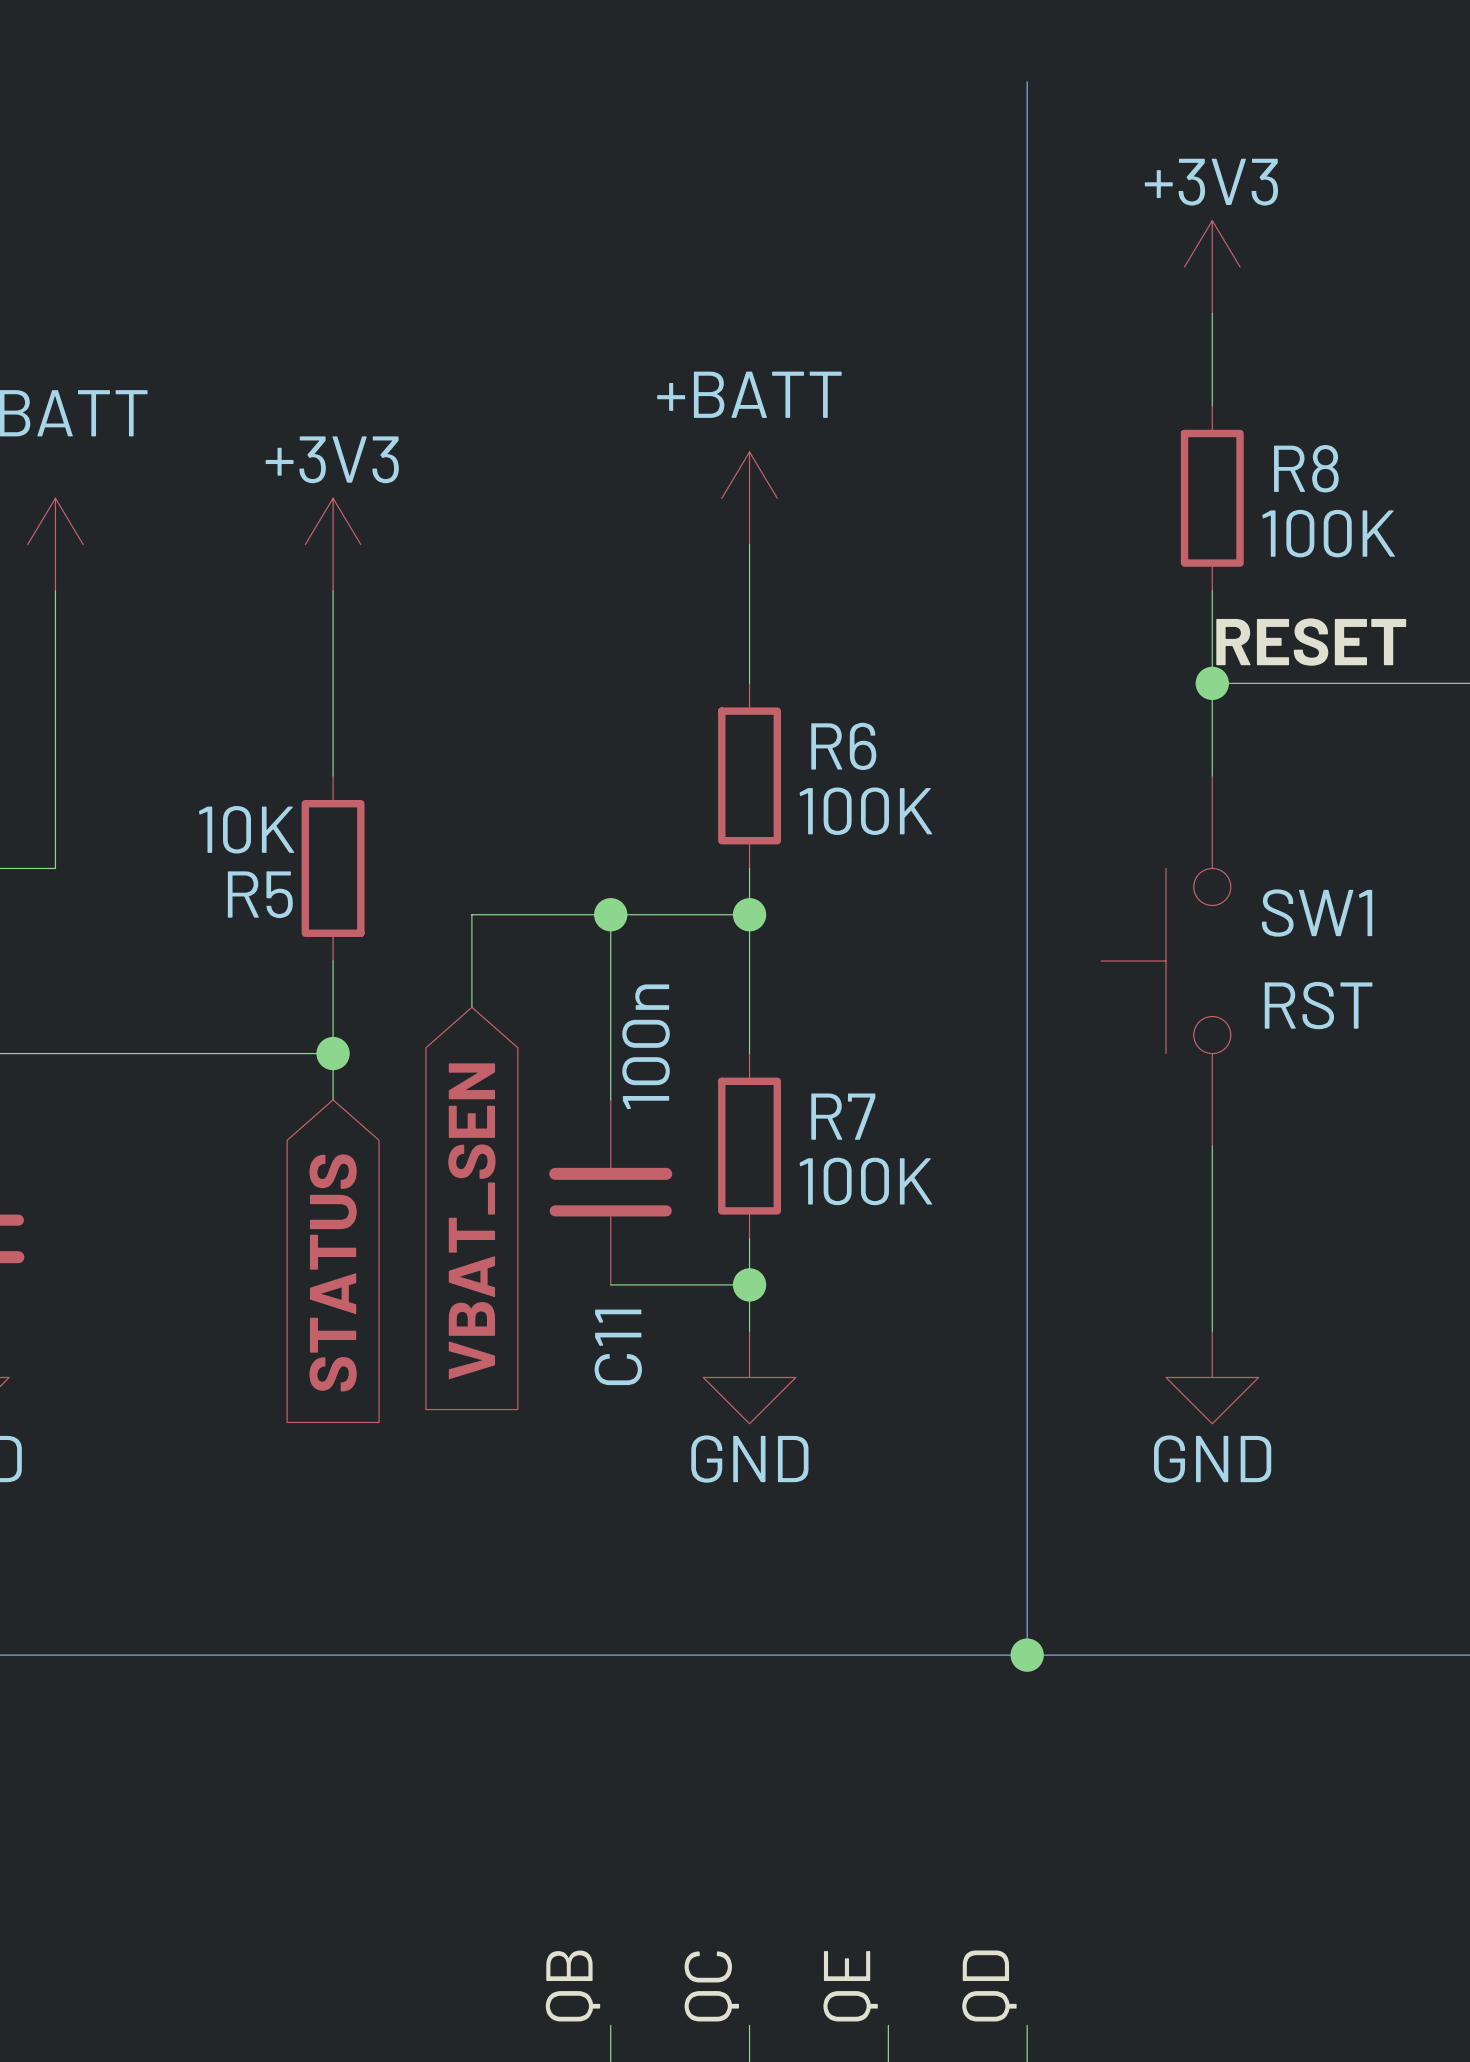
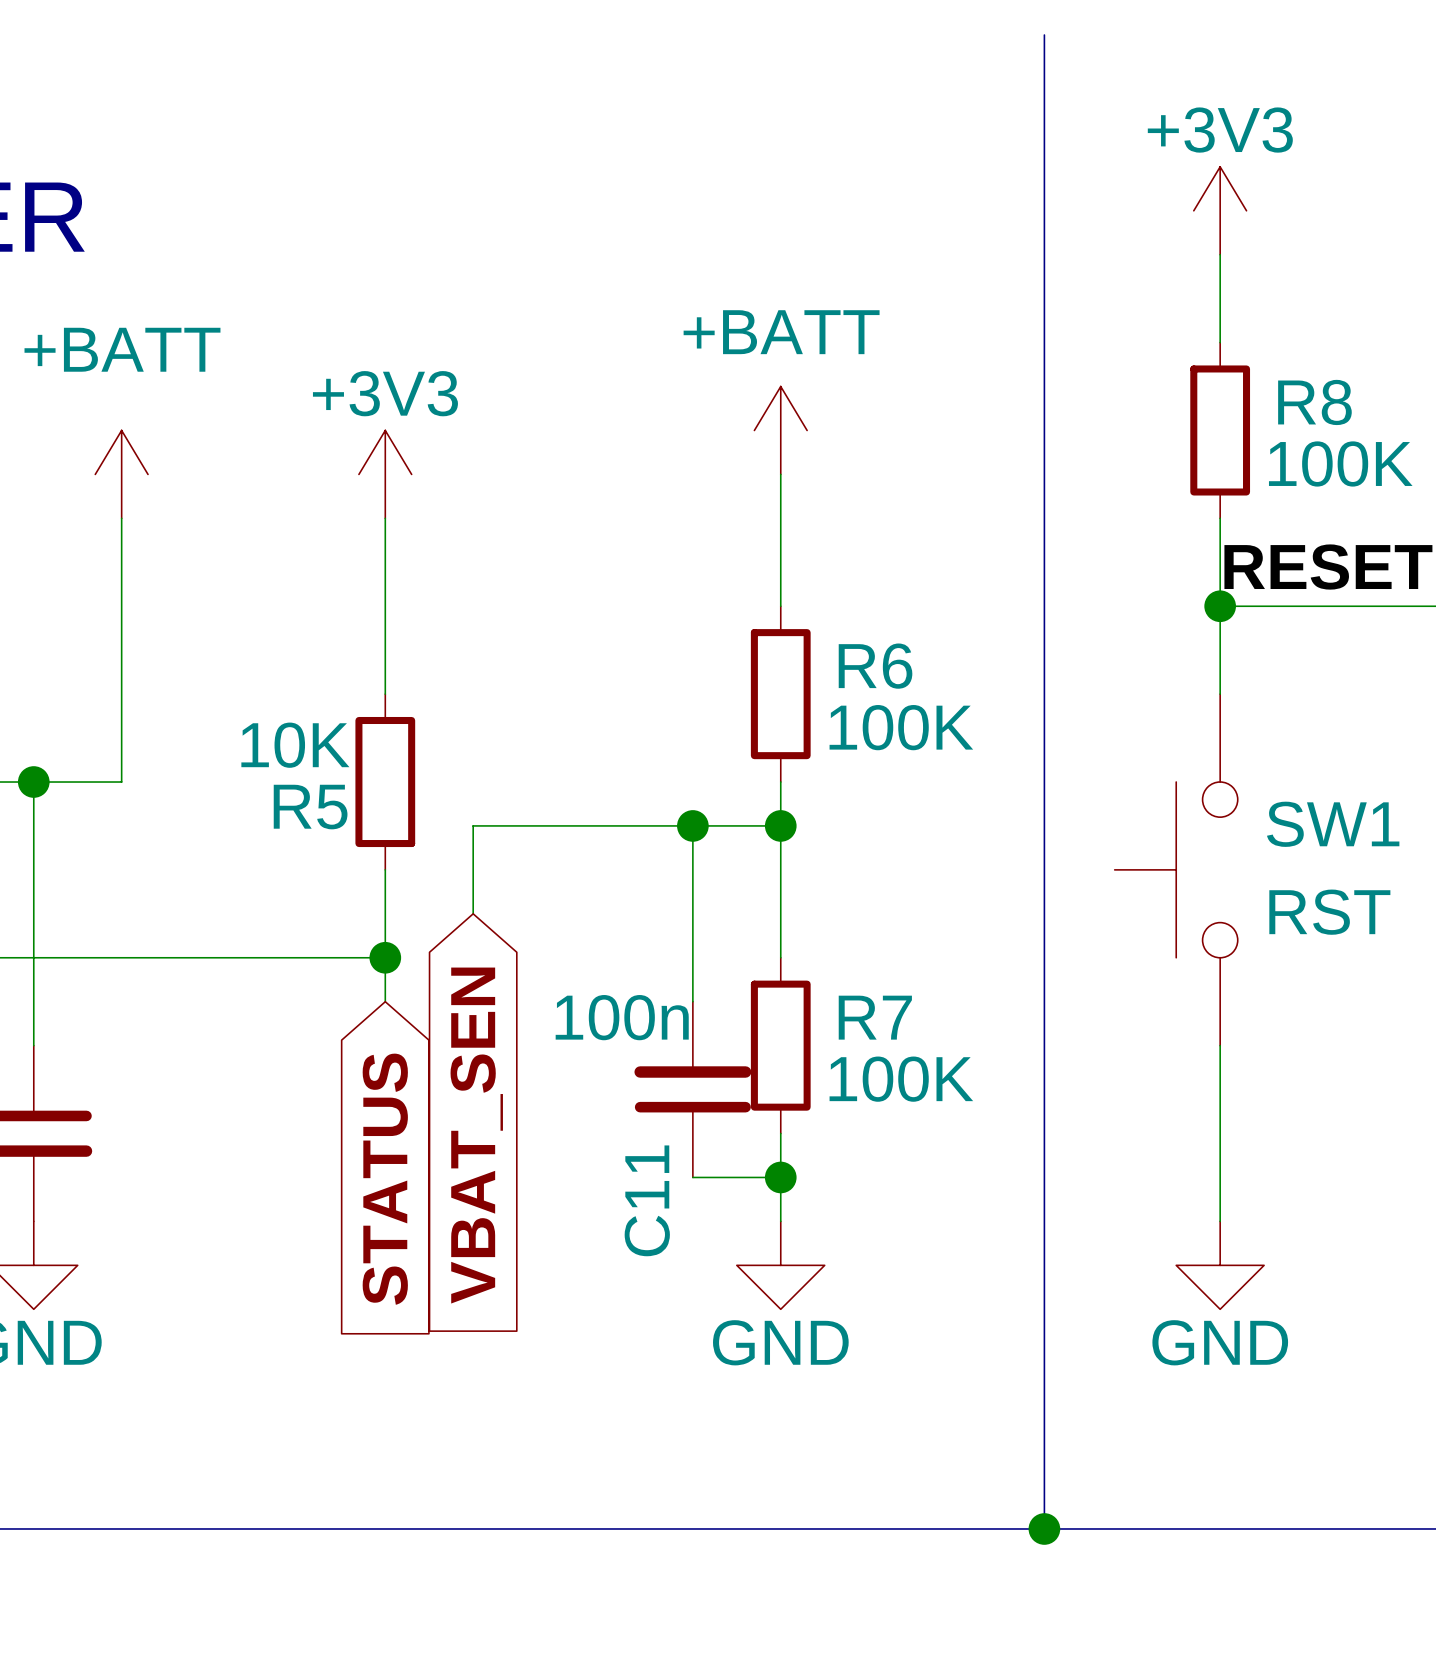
wire: (471, 914) (471, 1007) -> (517, 825) (473, 825) (473, 913)
wire: (610, 914) (610, 1099) -> (692, 825) (692, 1001)
junction position: (610, 914) -> (692, 825)
C11 value rotation: 0° (646, 1046) -> 90° clockwise (622, 1017)
C11 position: (610, 1192) -> (692, 1089)
global label position: VBAT_SEN (471, 1221) -> VBAT_SEN (476, 1135)
wire: (610, 1284) (657, 1284) -> none
C11 name position: C11 (618, 1347) -> C11 (647, 1200)

